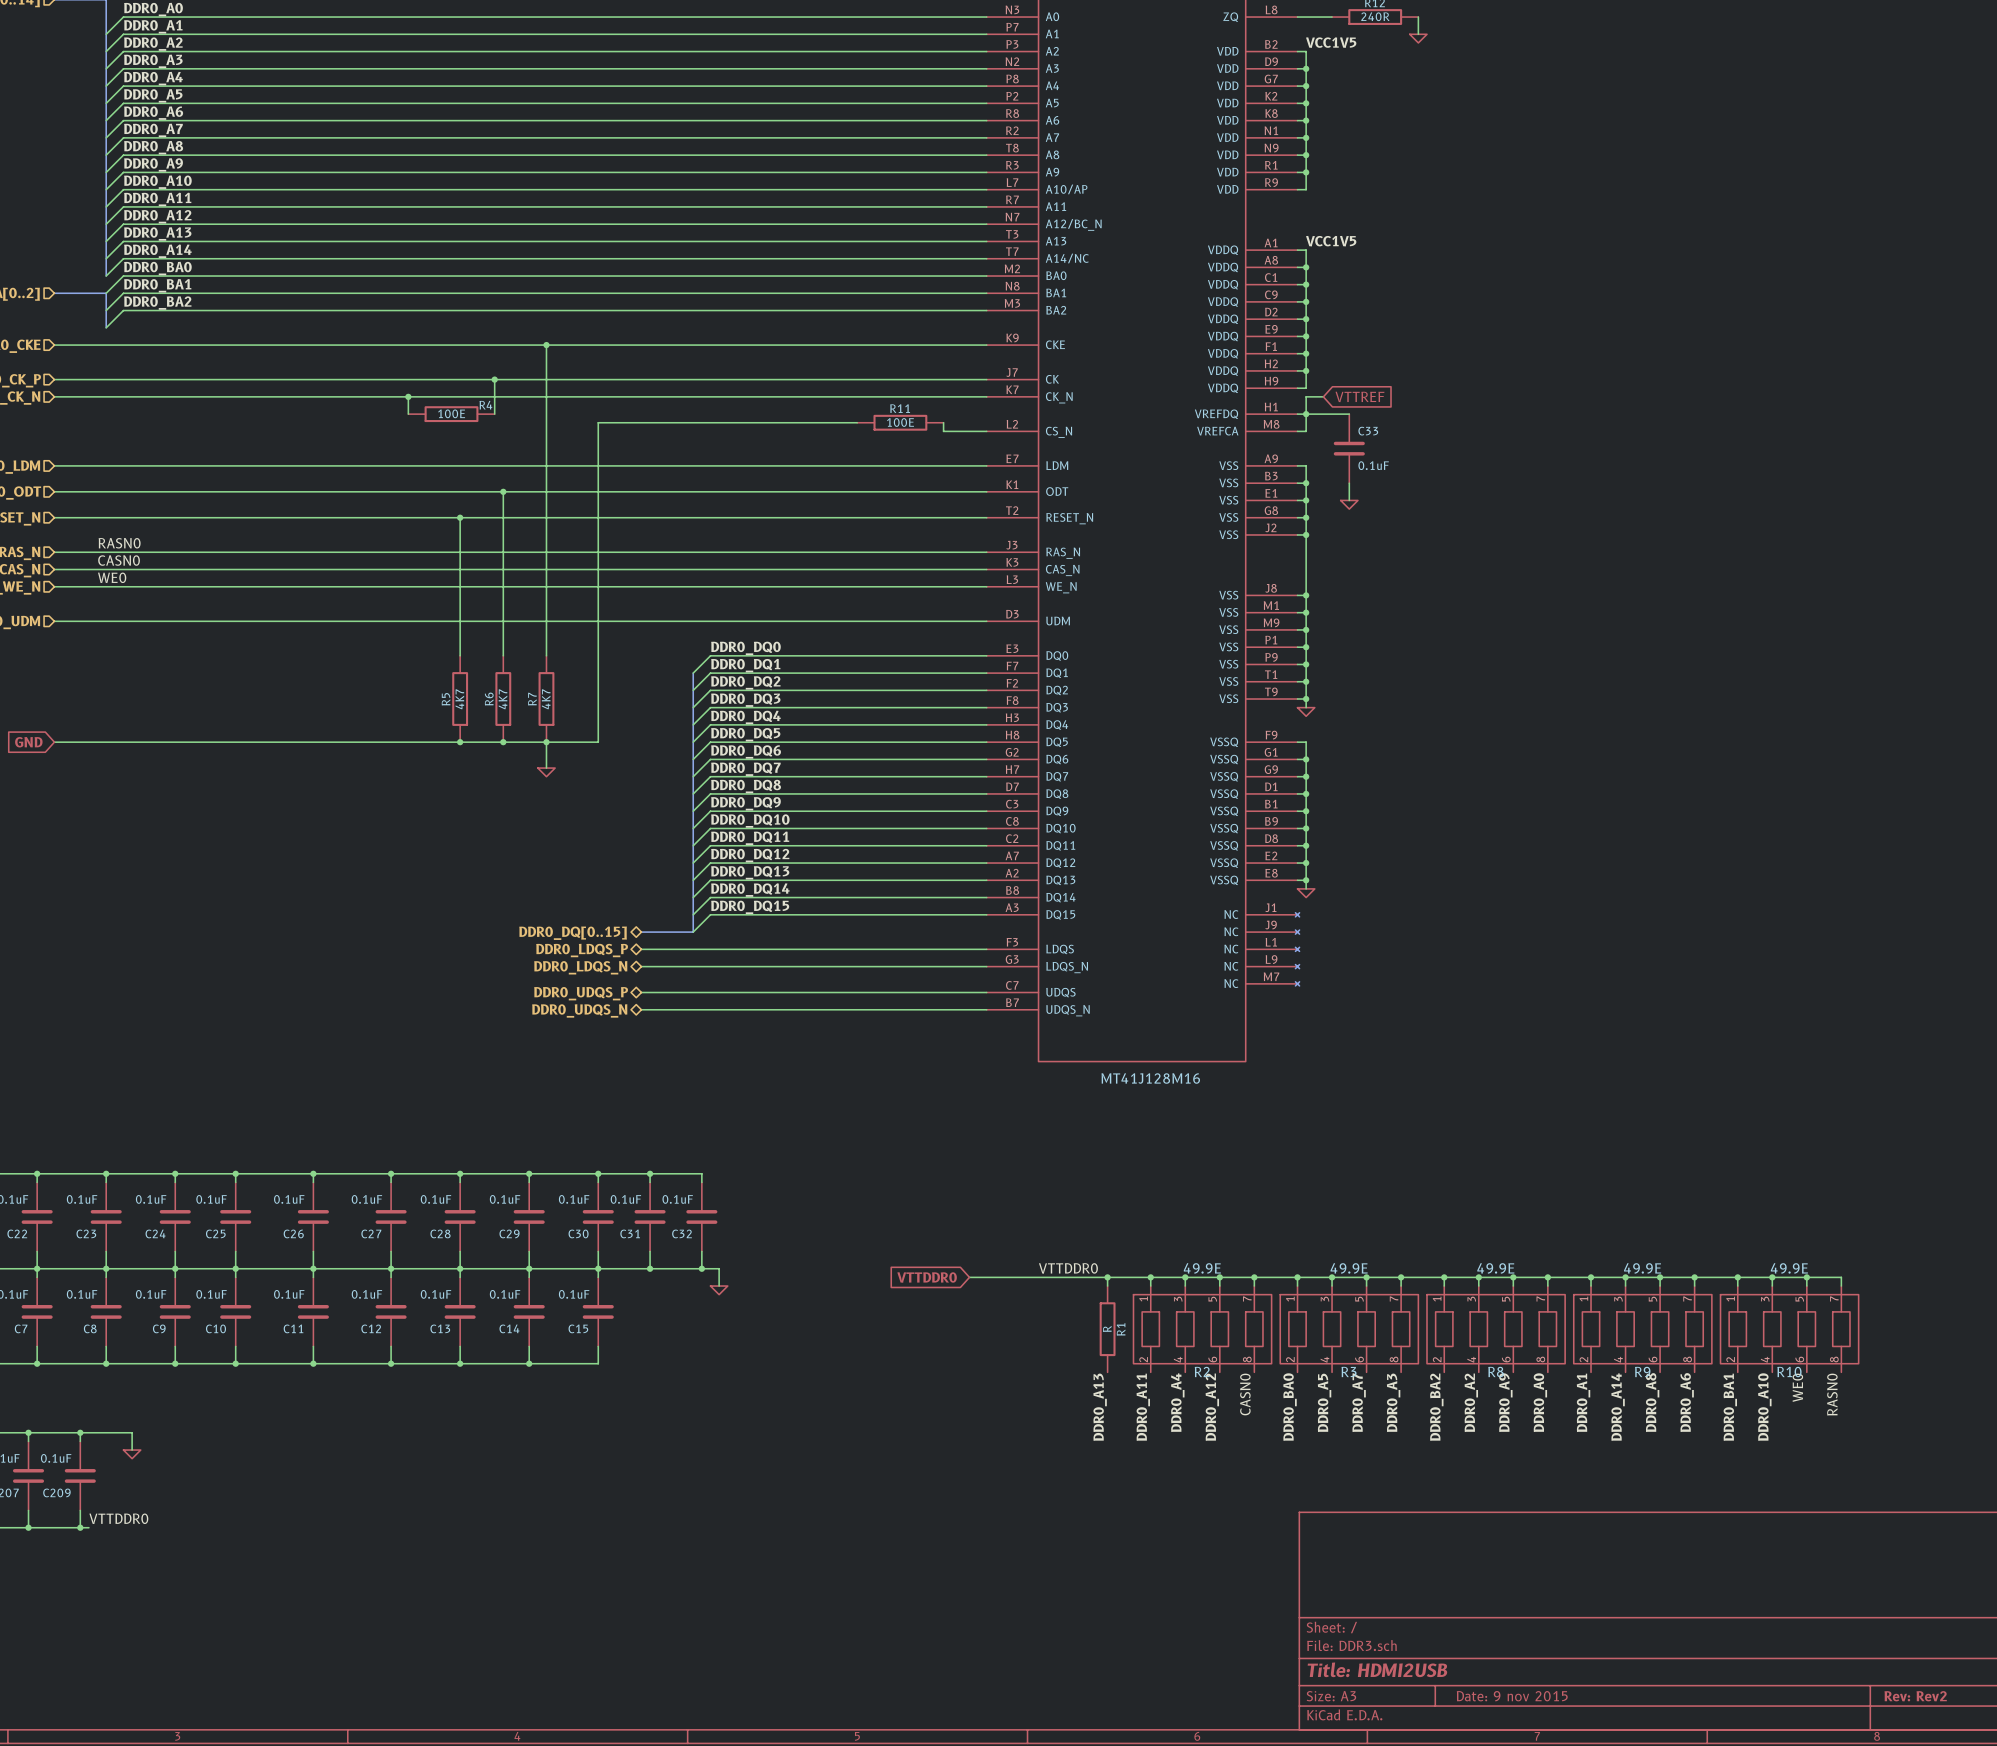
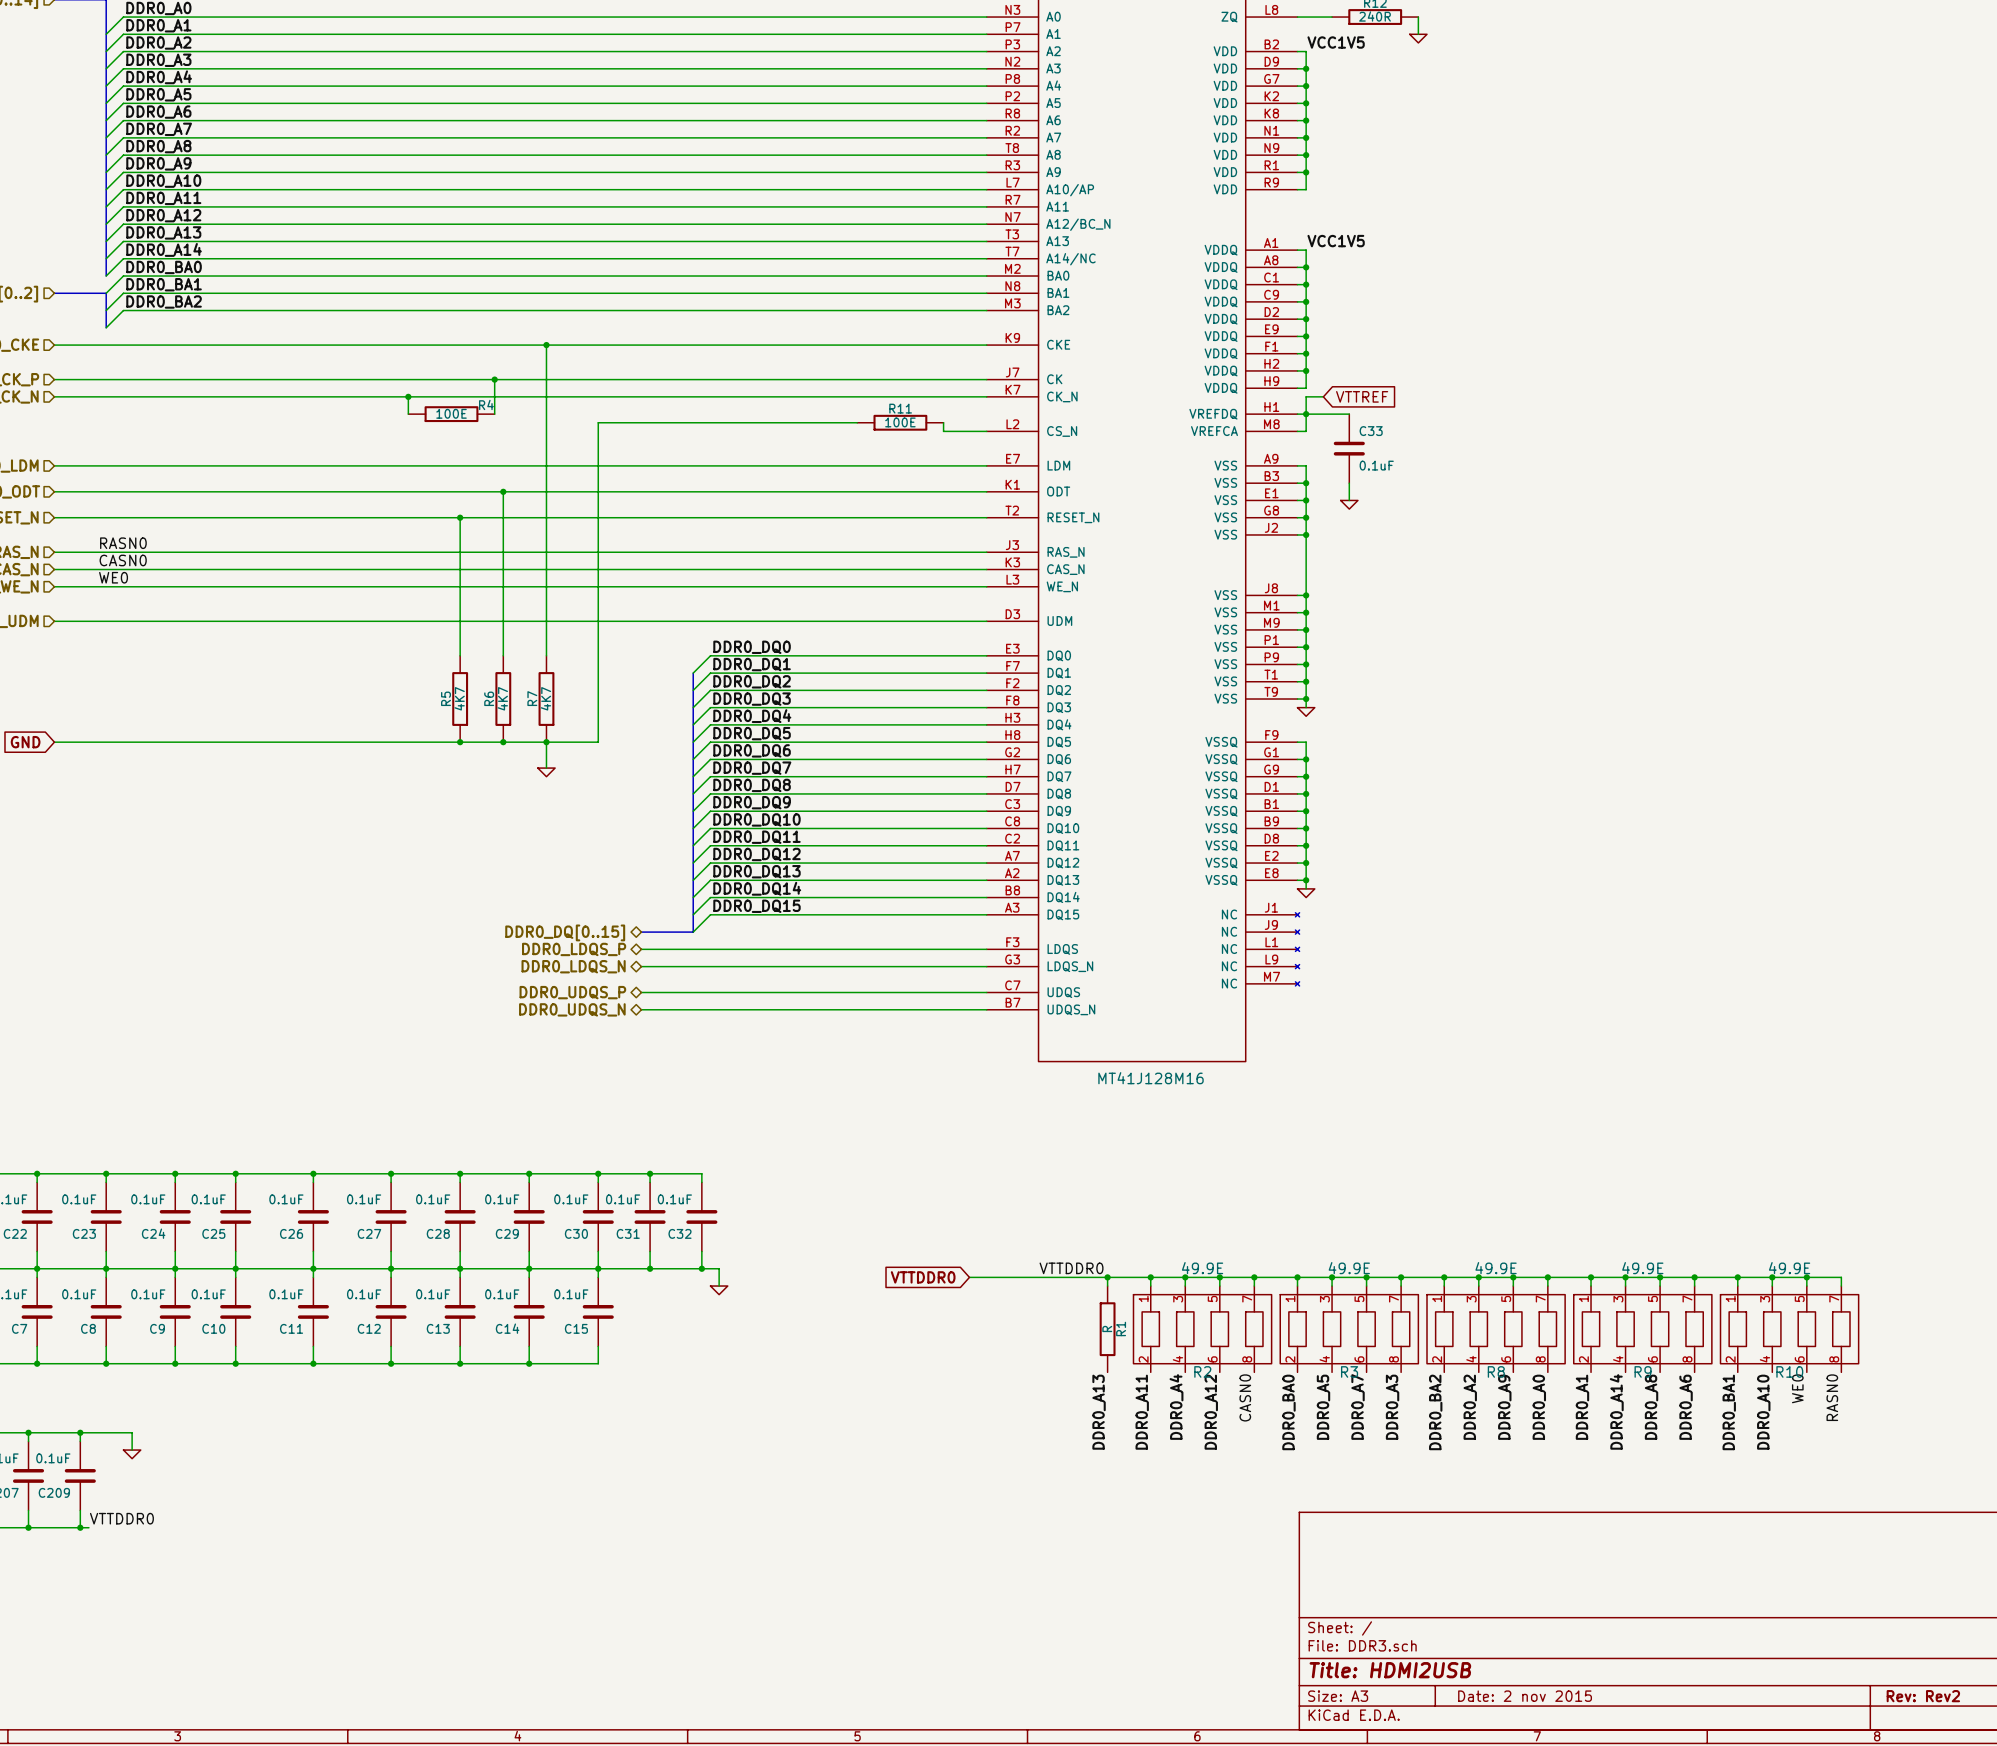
title block: Date: 9 nov 2015 (1512, 1696) -> Date: 2 nov 2015 (1525, 1696)

